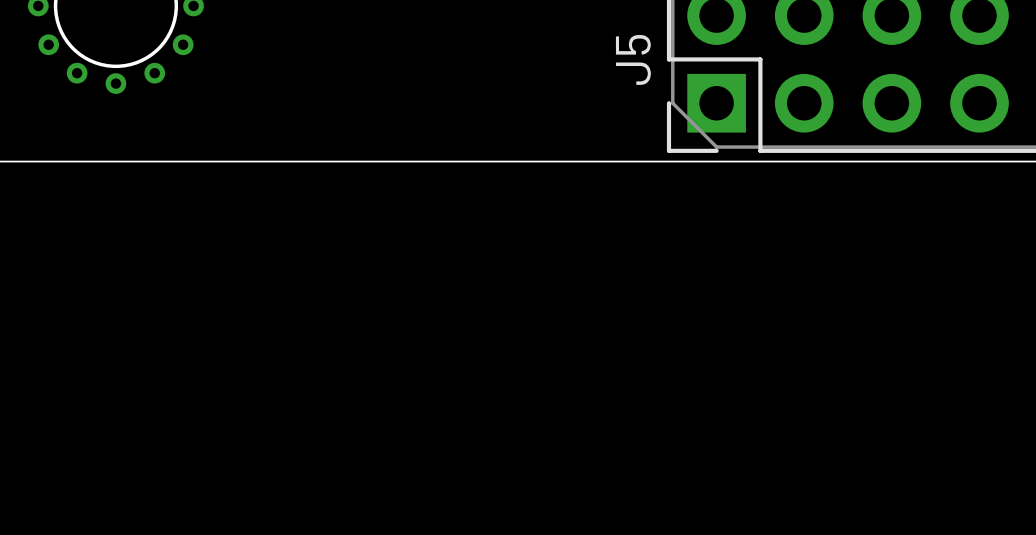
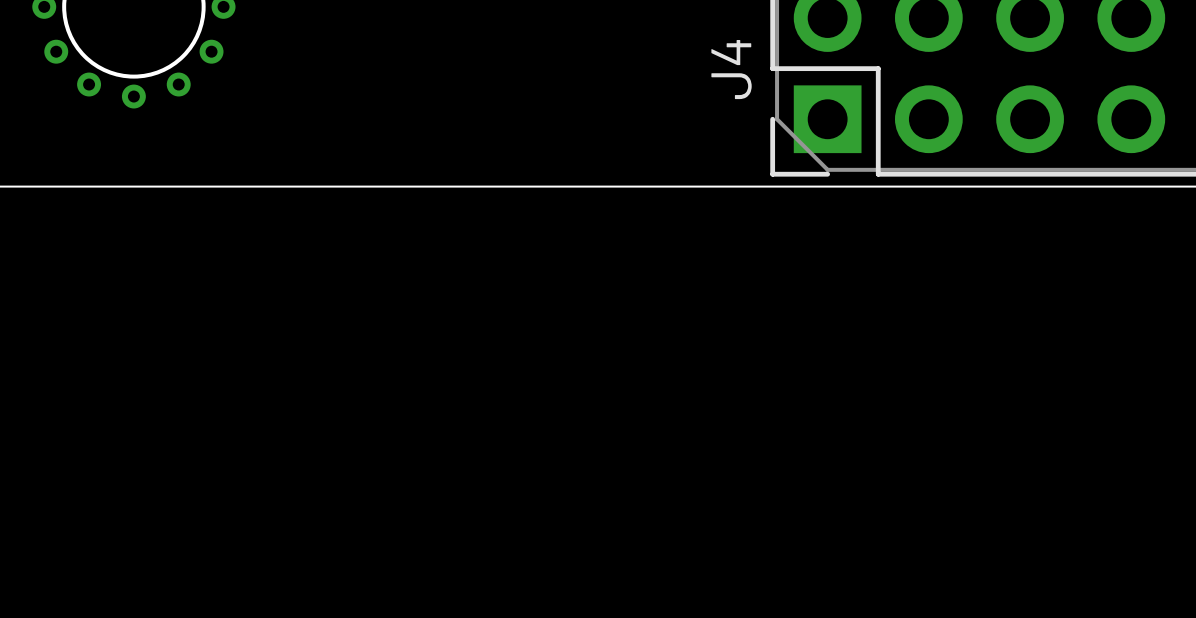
J5 name: J5 (633, 59) -> J4 (731, 69)

